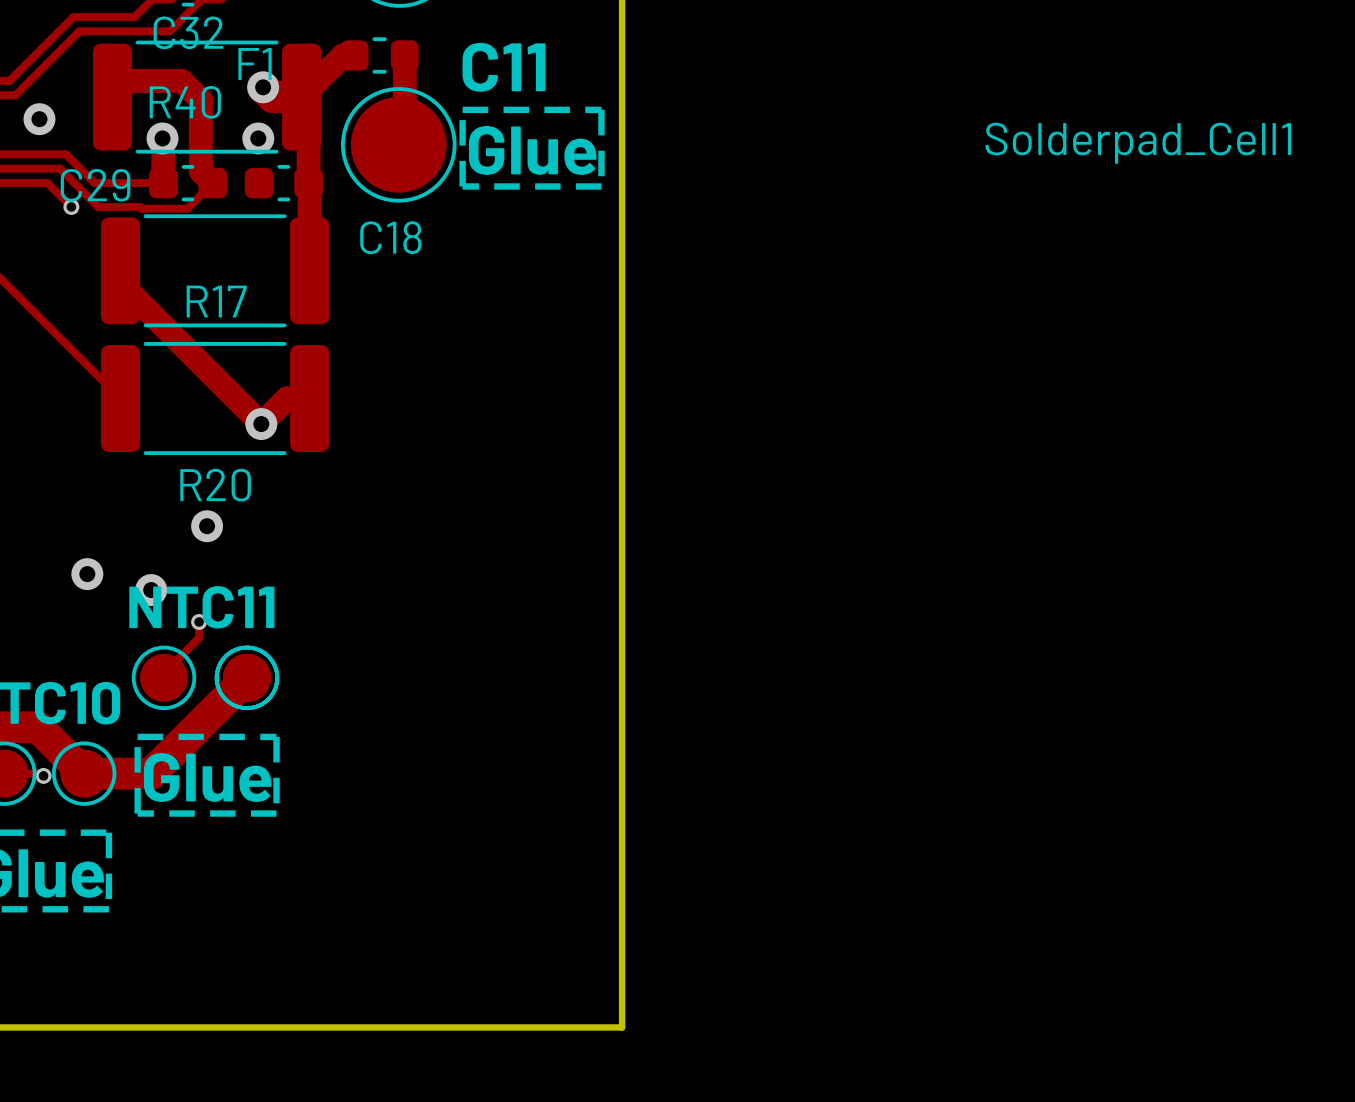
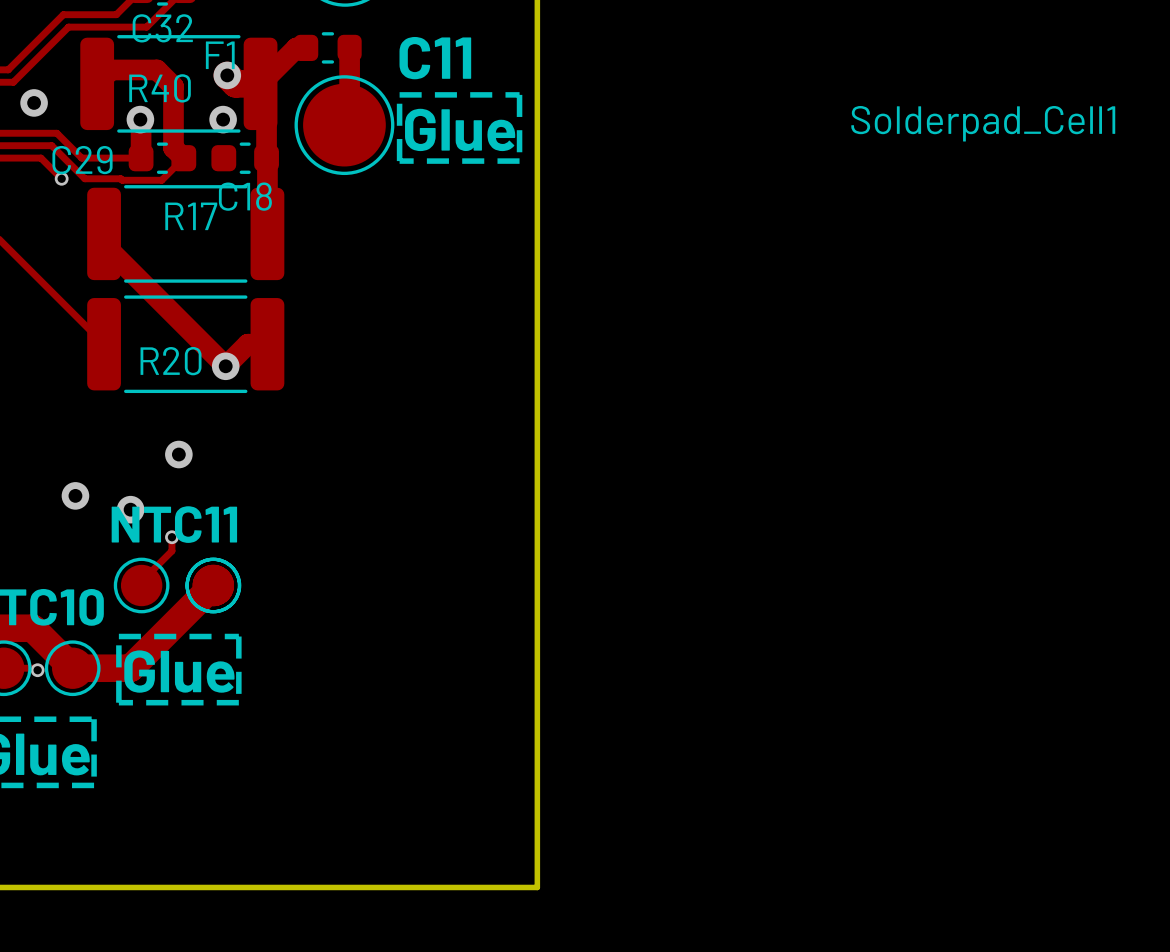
C18 name position: C18 (390, 237) -> C18 (245, 196)
R17 name position: R17 (216, 301) -> R17 (191, 216)
R20 name position: R20 (215, 485) -> R20 (171, 361)

